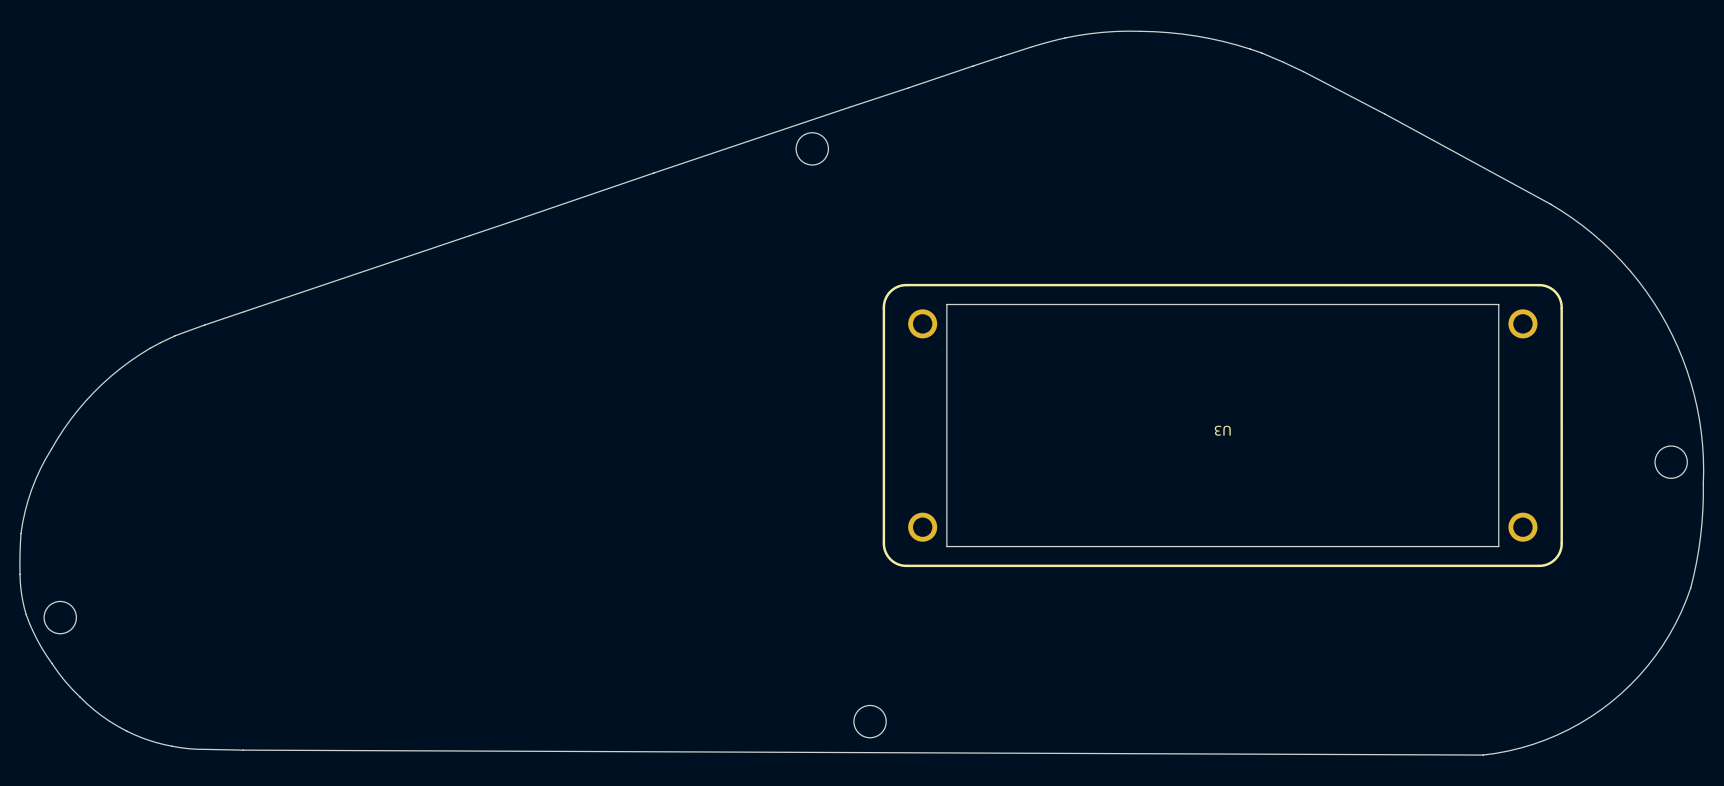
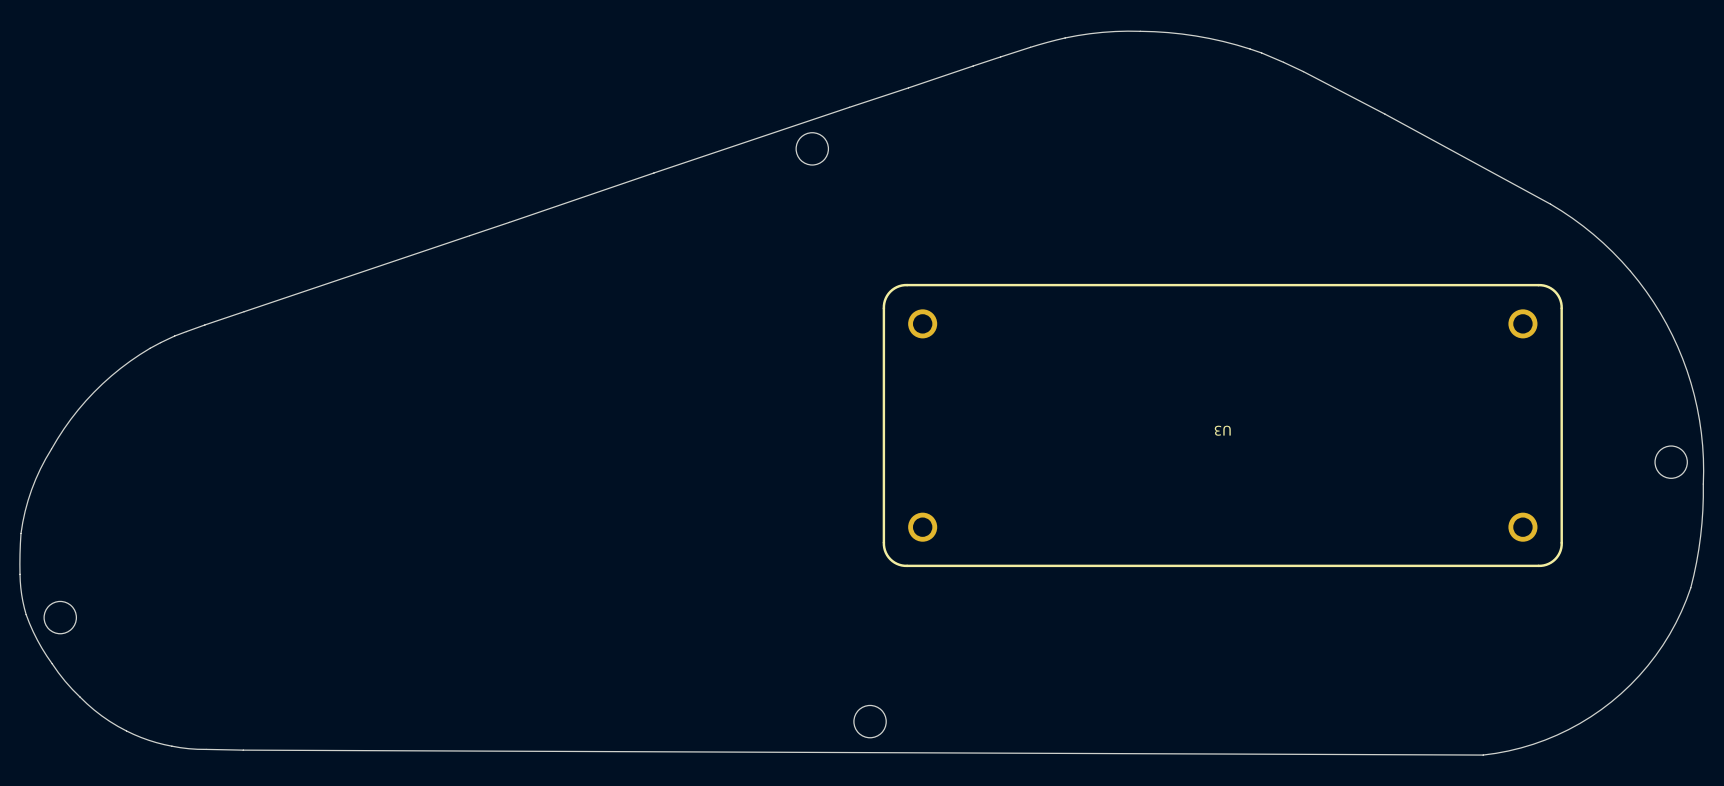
U3 footprint: [882, 283, 1563, 568] -> [882, 283, 1563, 568]

